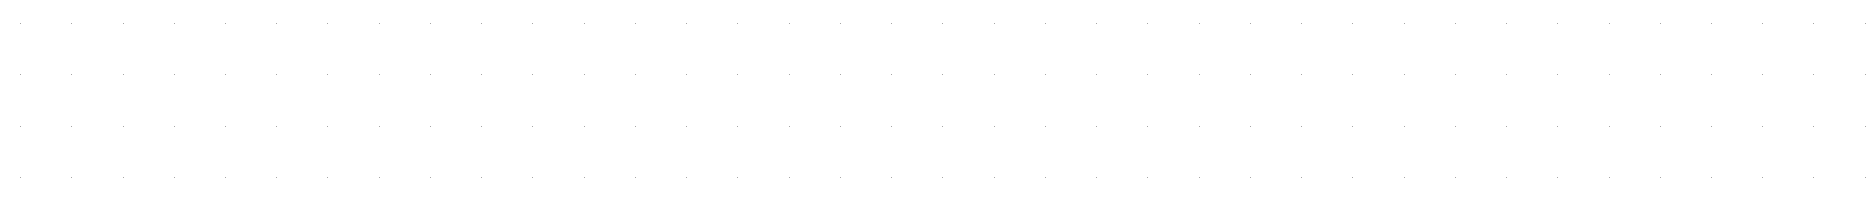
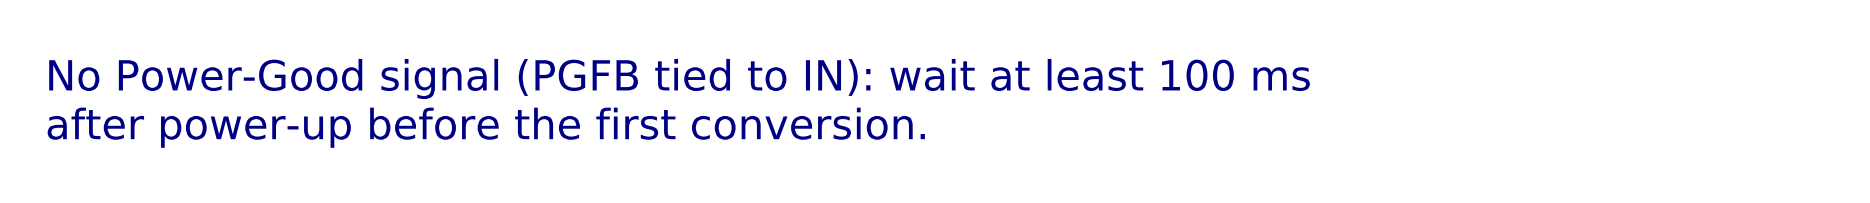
text: none -> No Power-Good signal (PGFB tied to IN): wait at least 100 ms (679, 79)
text: none -> after power-up before the first conversion. (486, 127)

